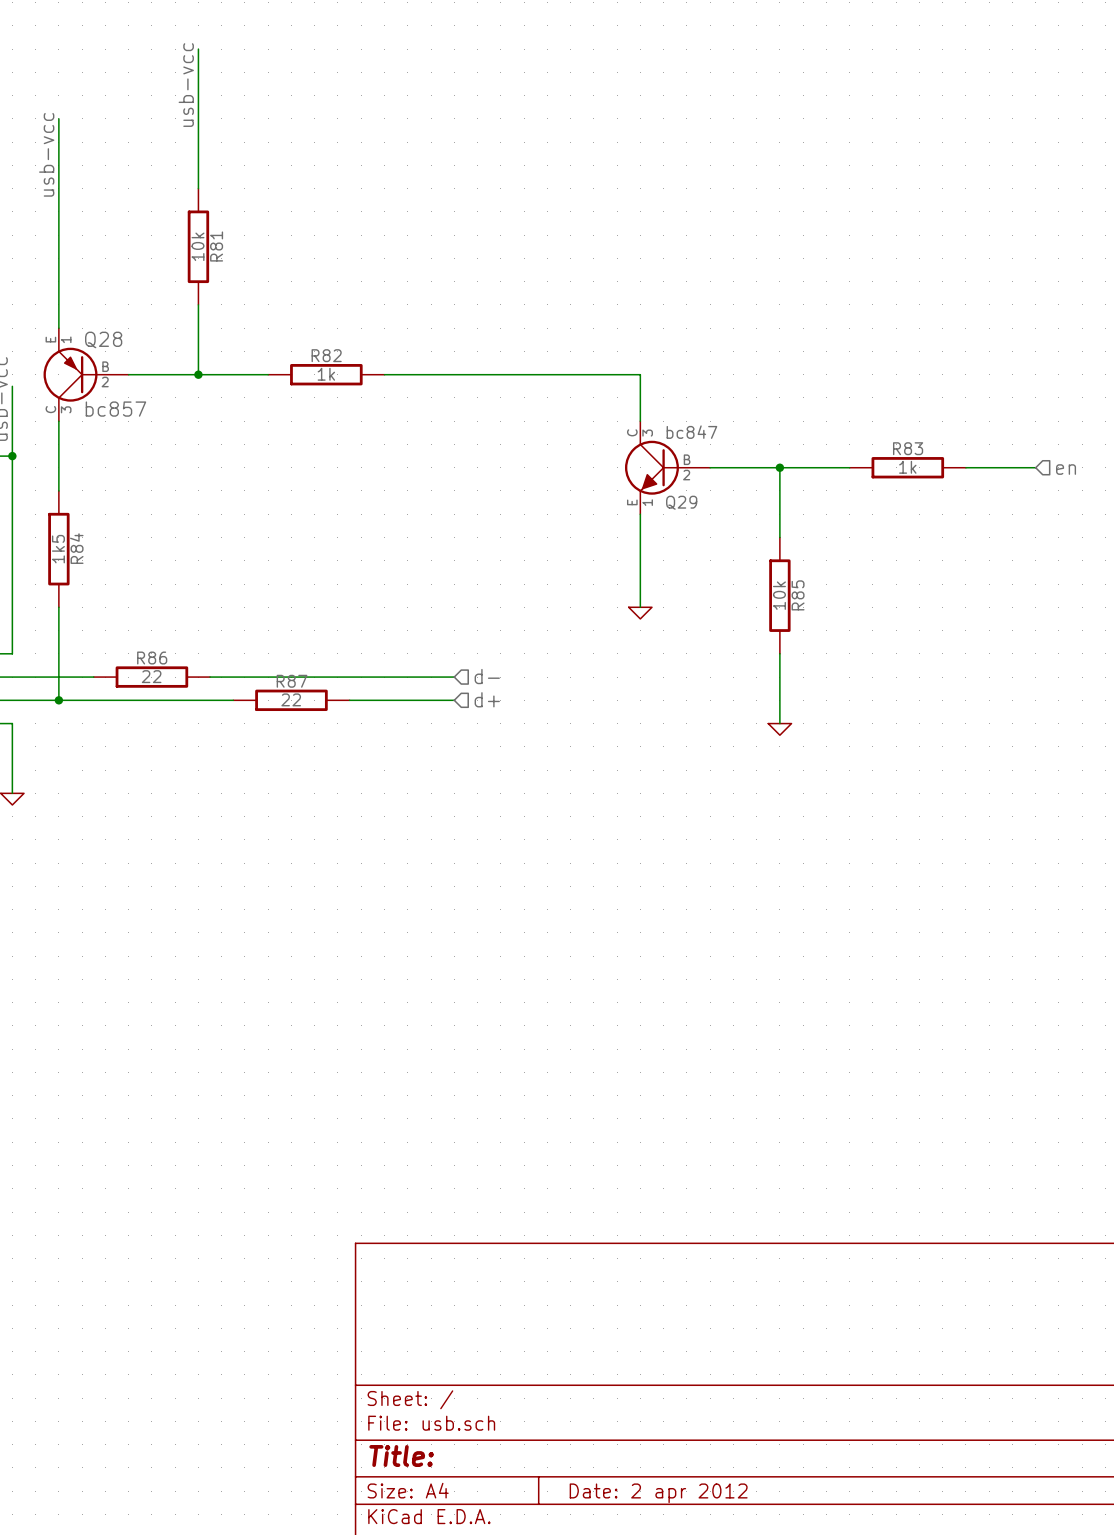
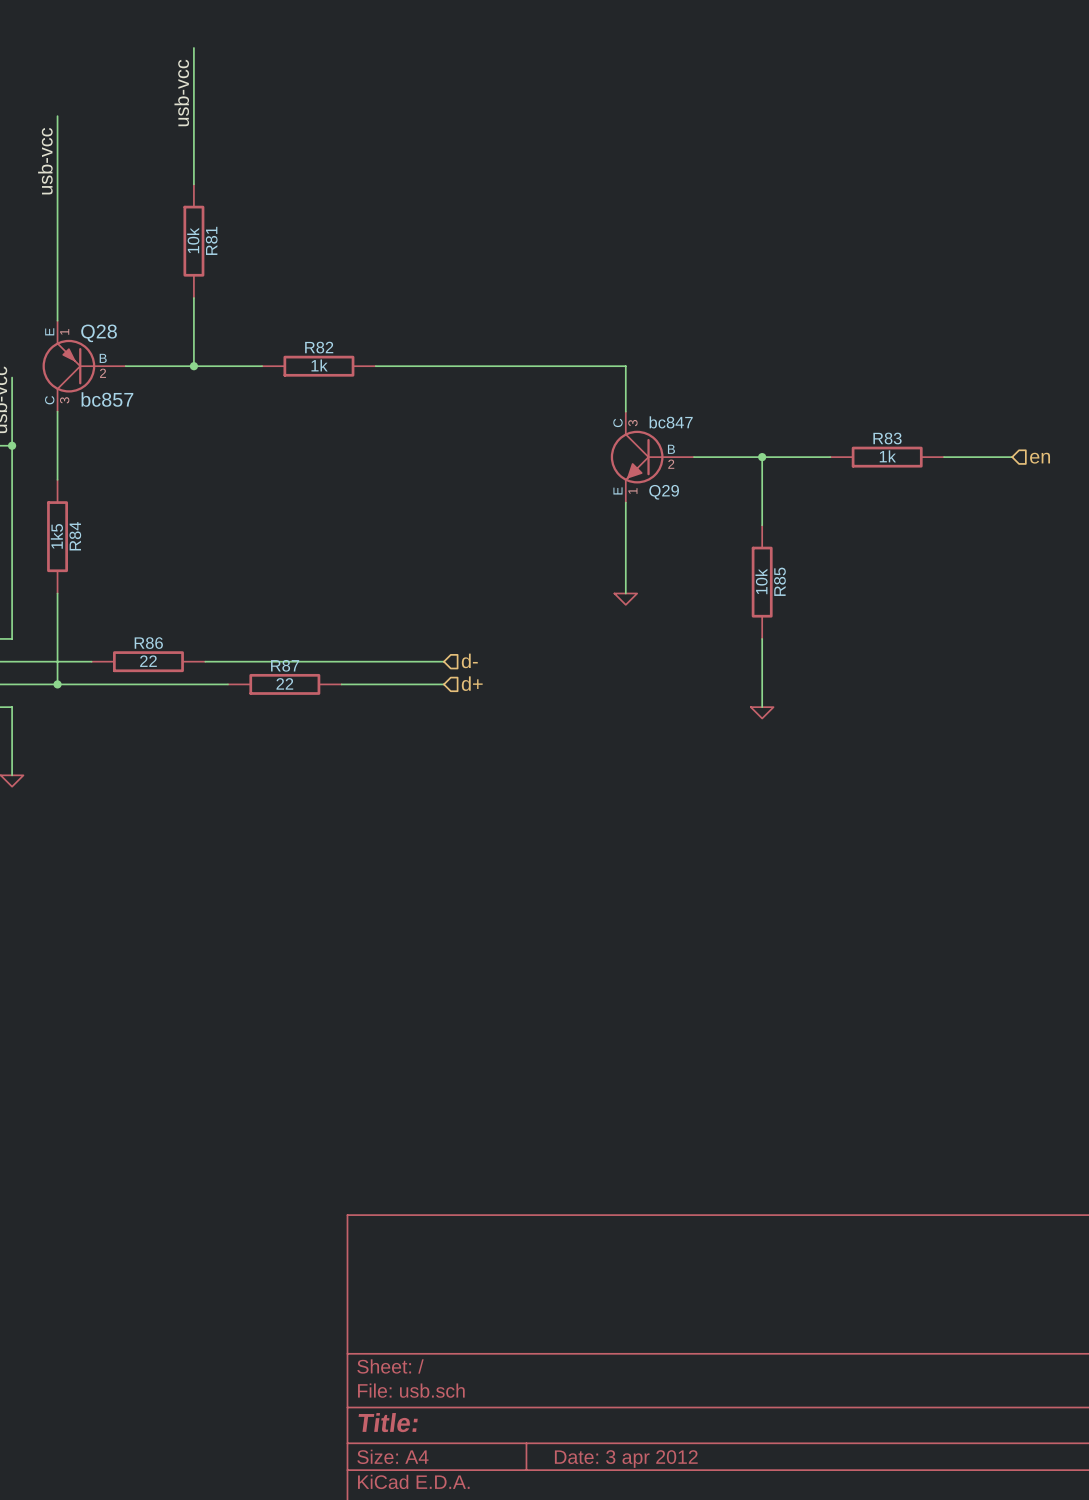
title block: Date: 2 apr 2012 (658, 1493) -> Date: 3 apr 2012 (626, 1459)

